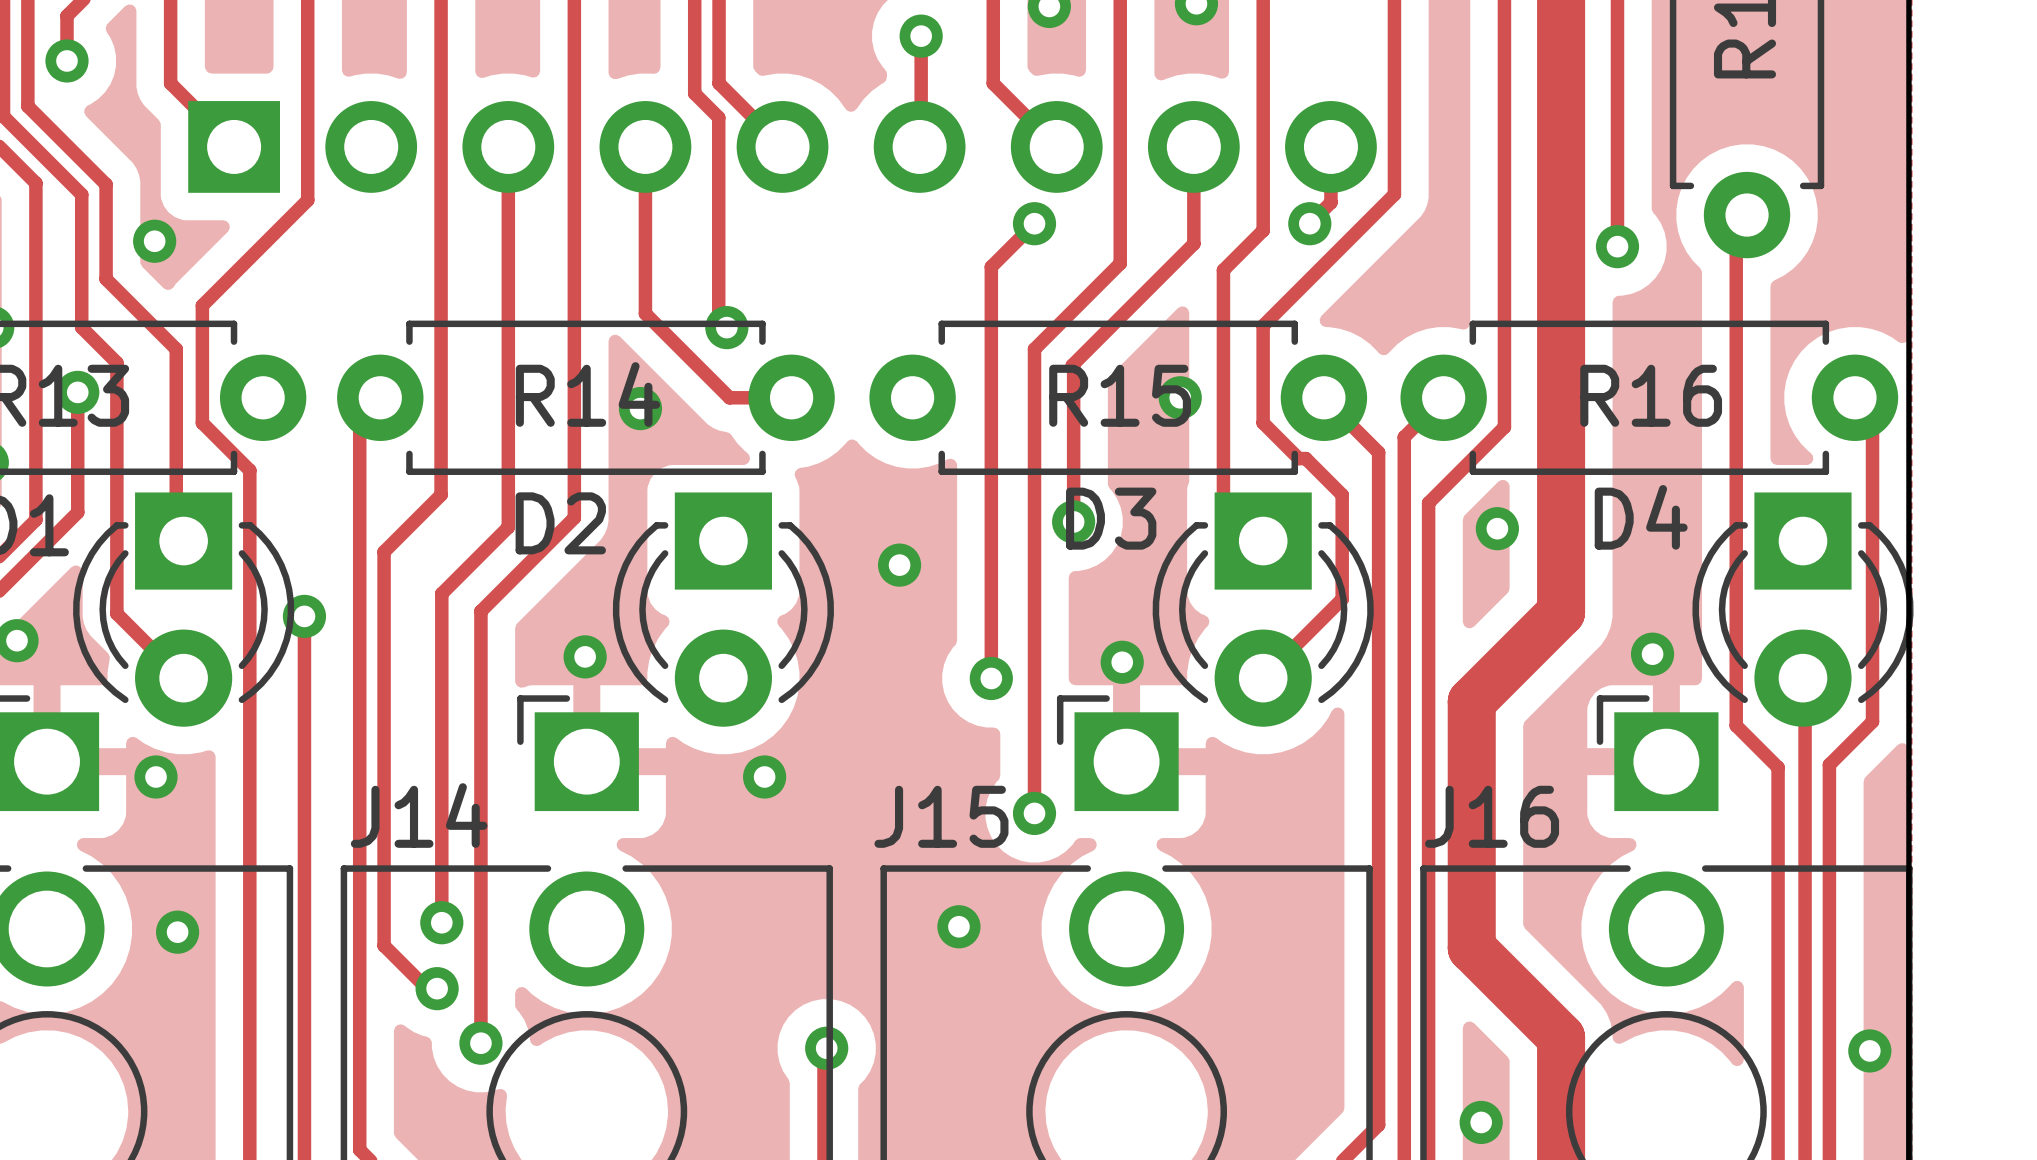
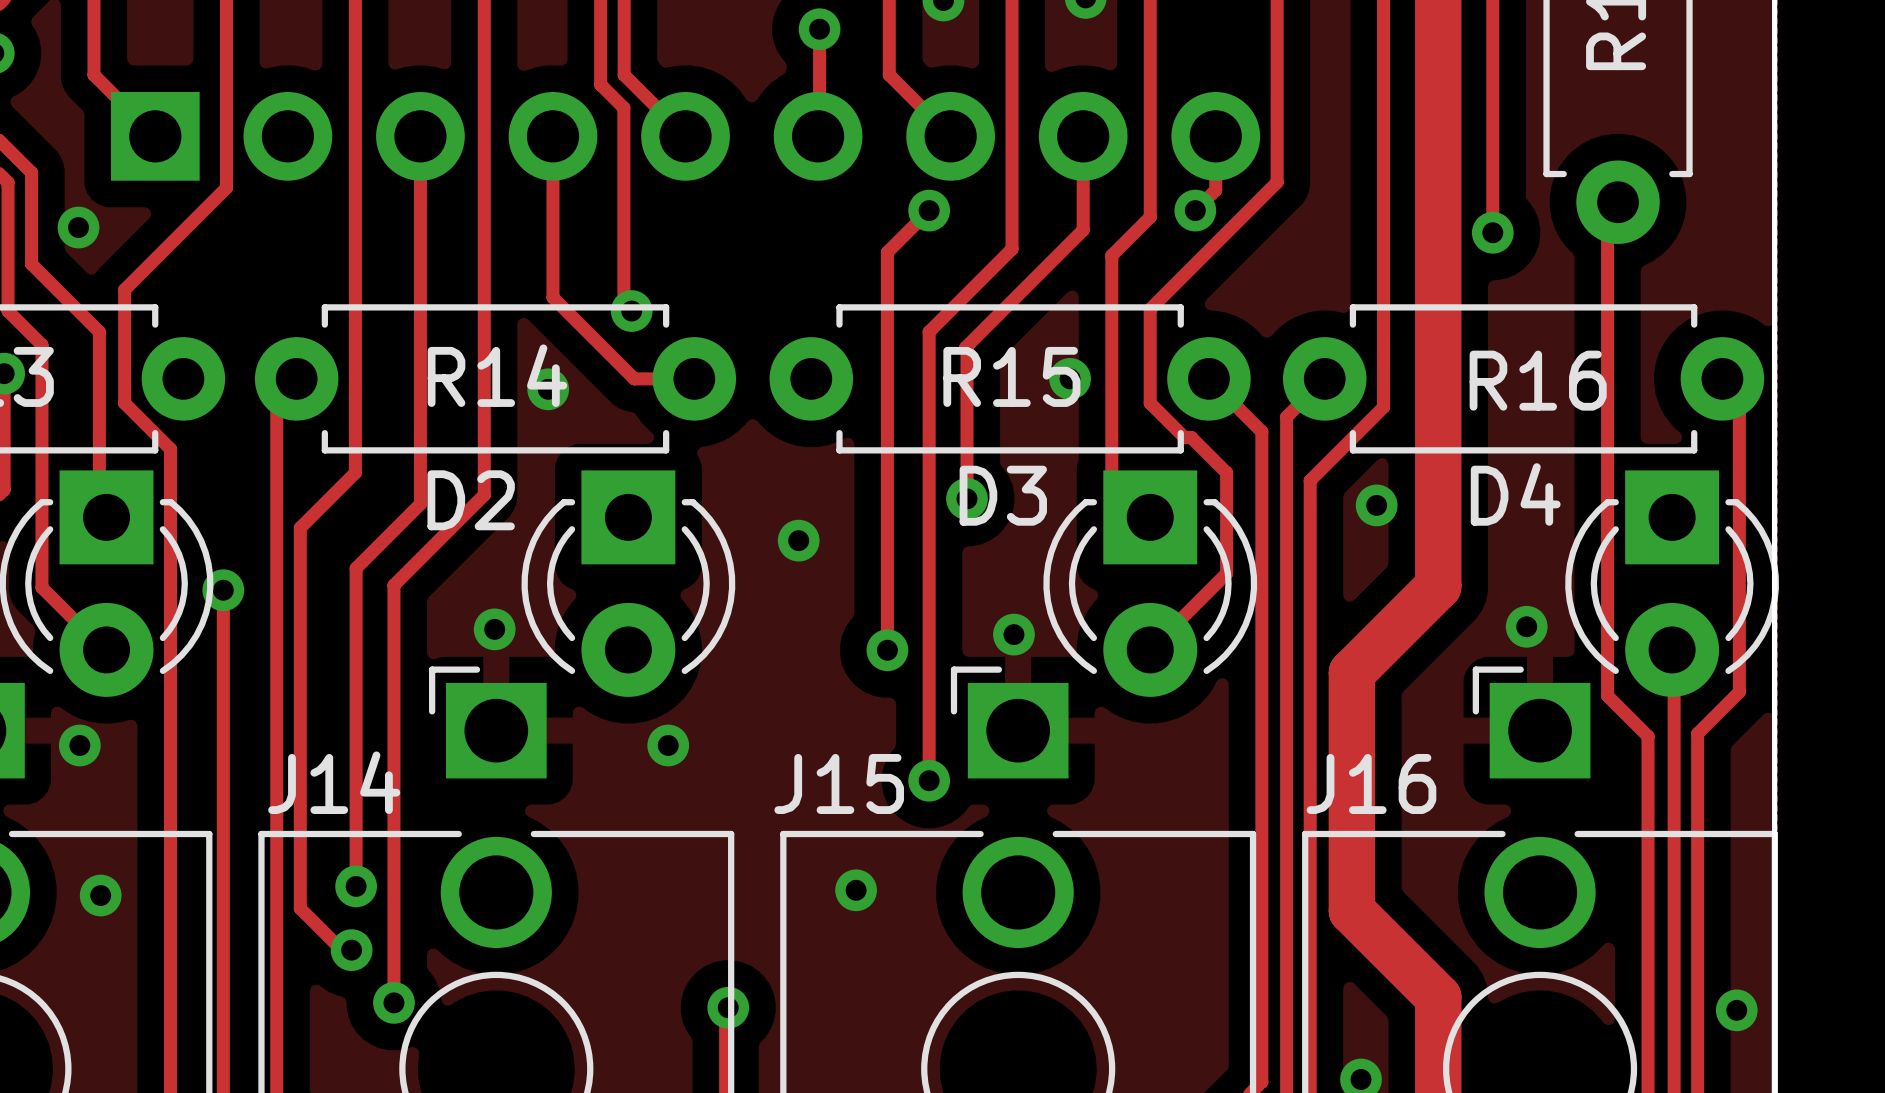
R16 name position: R16 (1651, 395) -> R16 (1538, 380)

